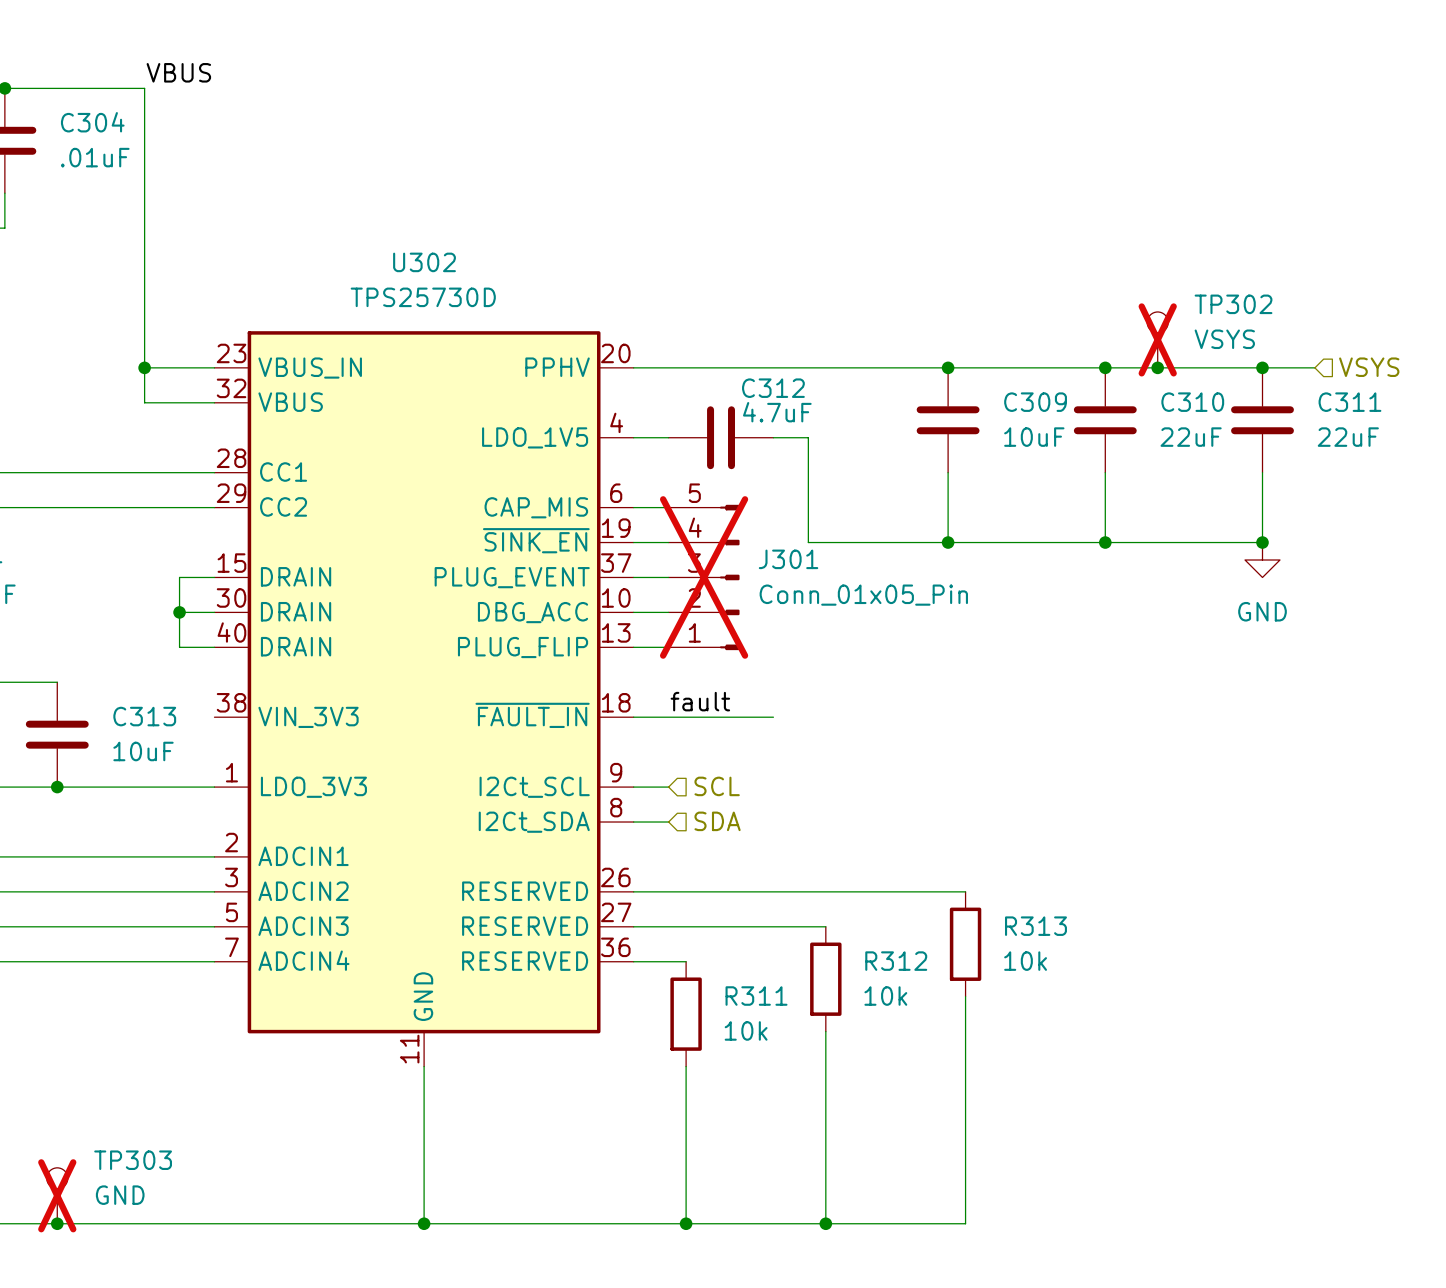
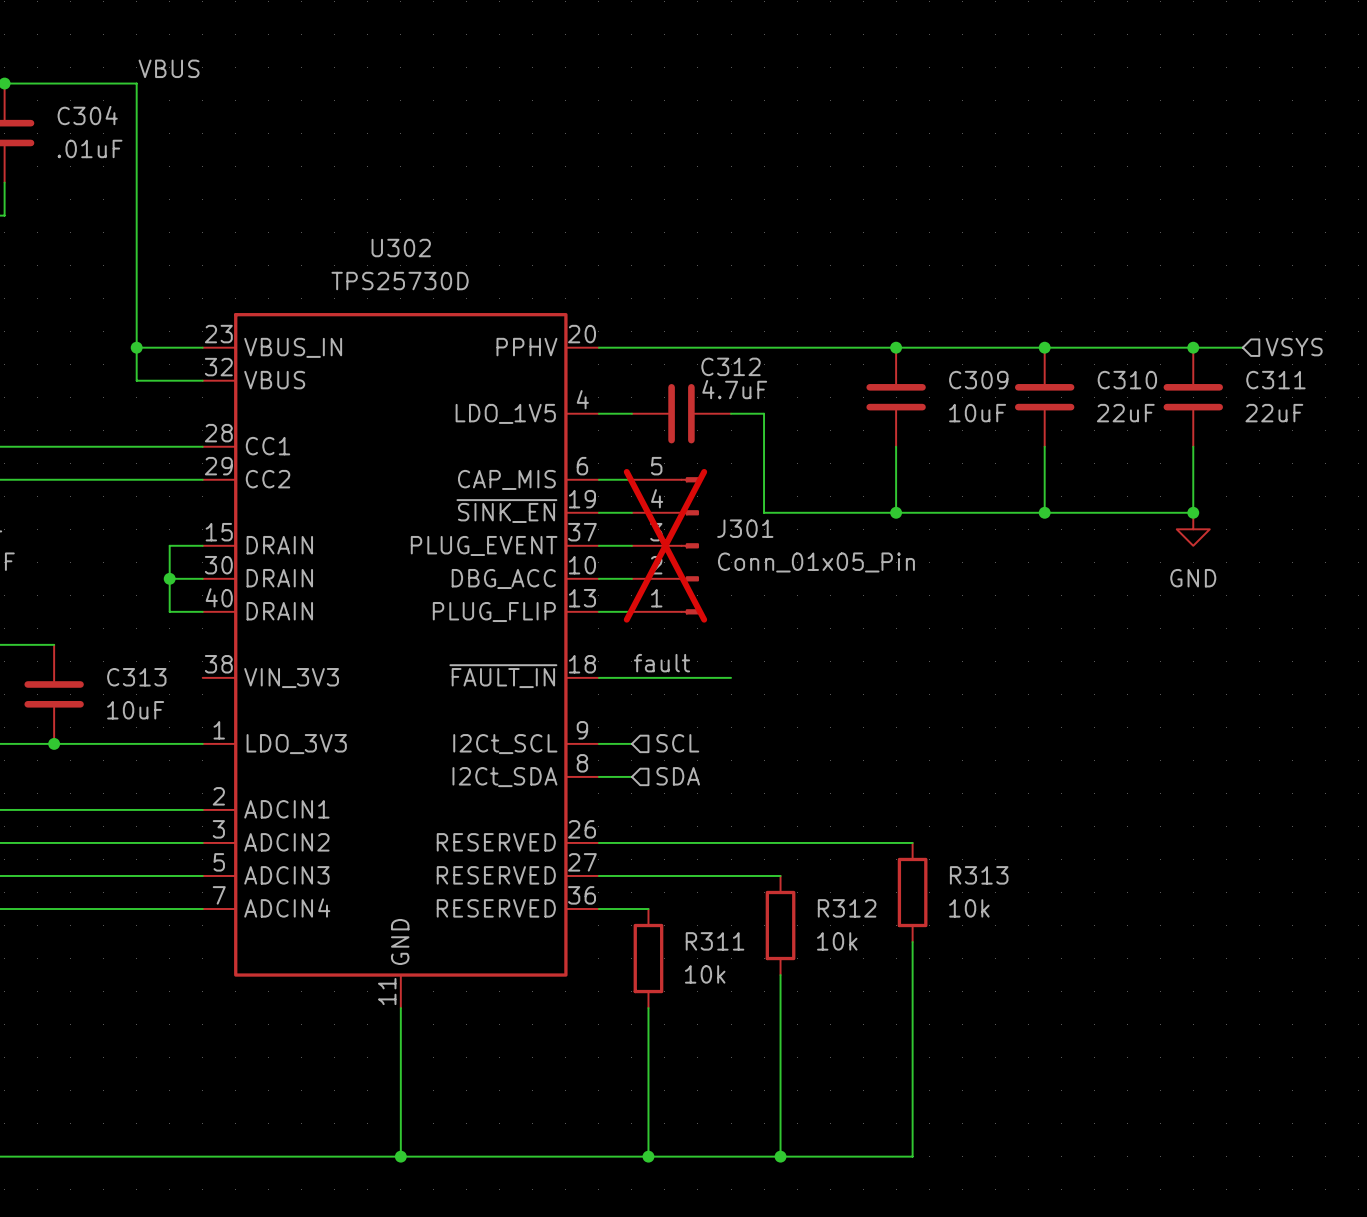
TP302: VSYS (1157, 339) -> none
junction: (1157, 367) -> none
TP303: GND (57, 1195) -> none
junction: (57, 1223) -> none

